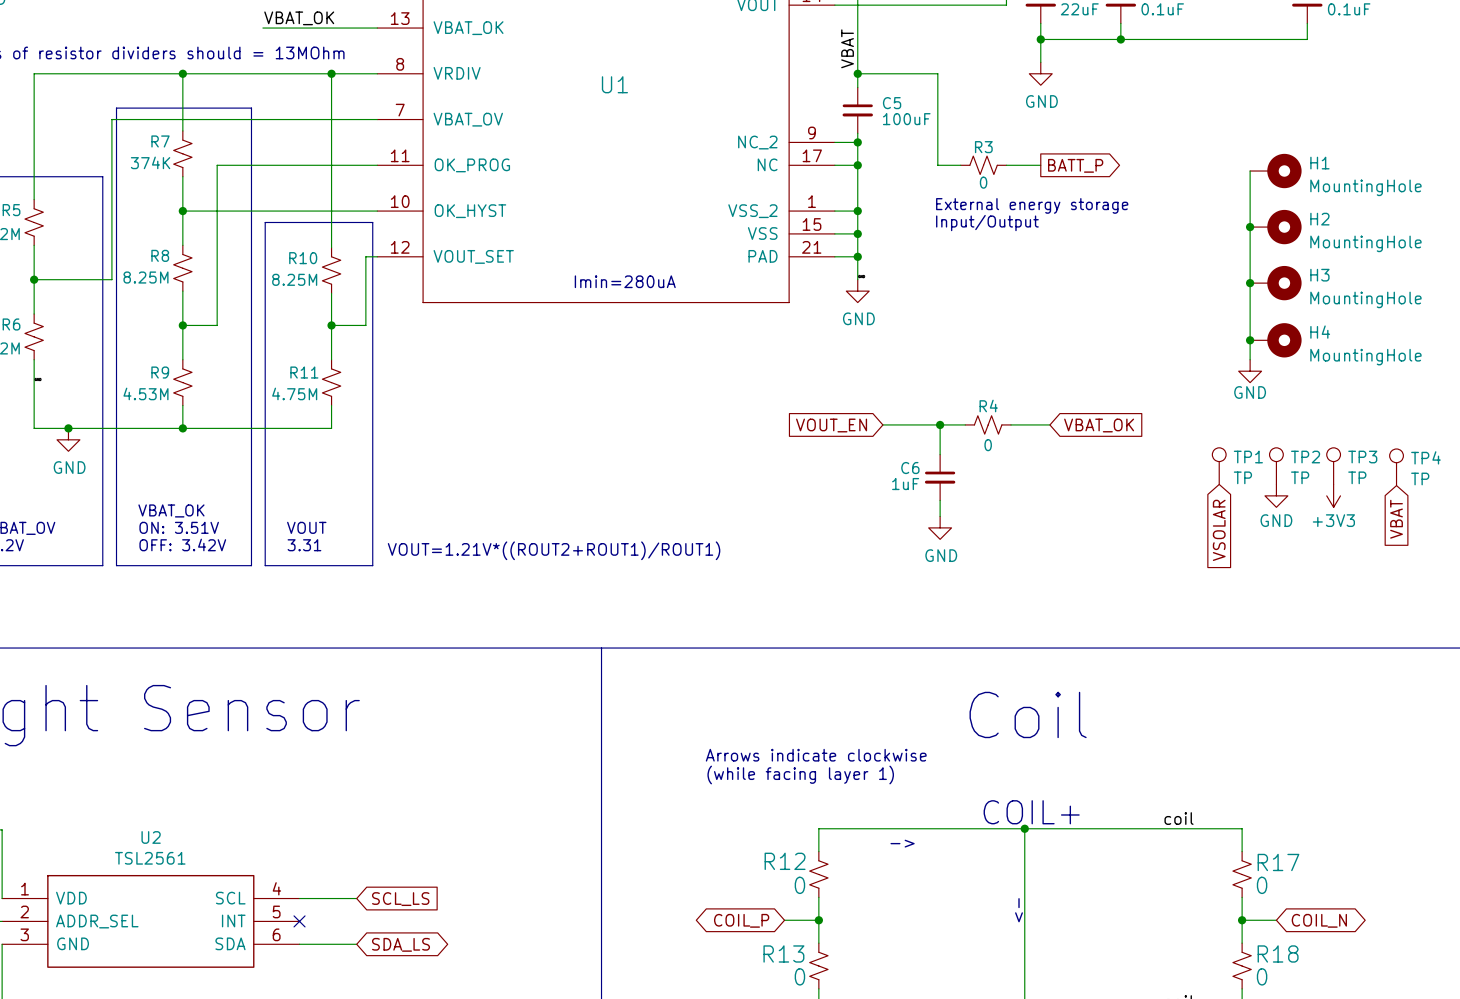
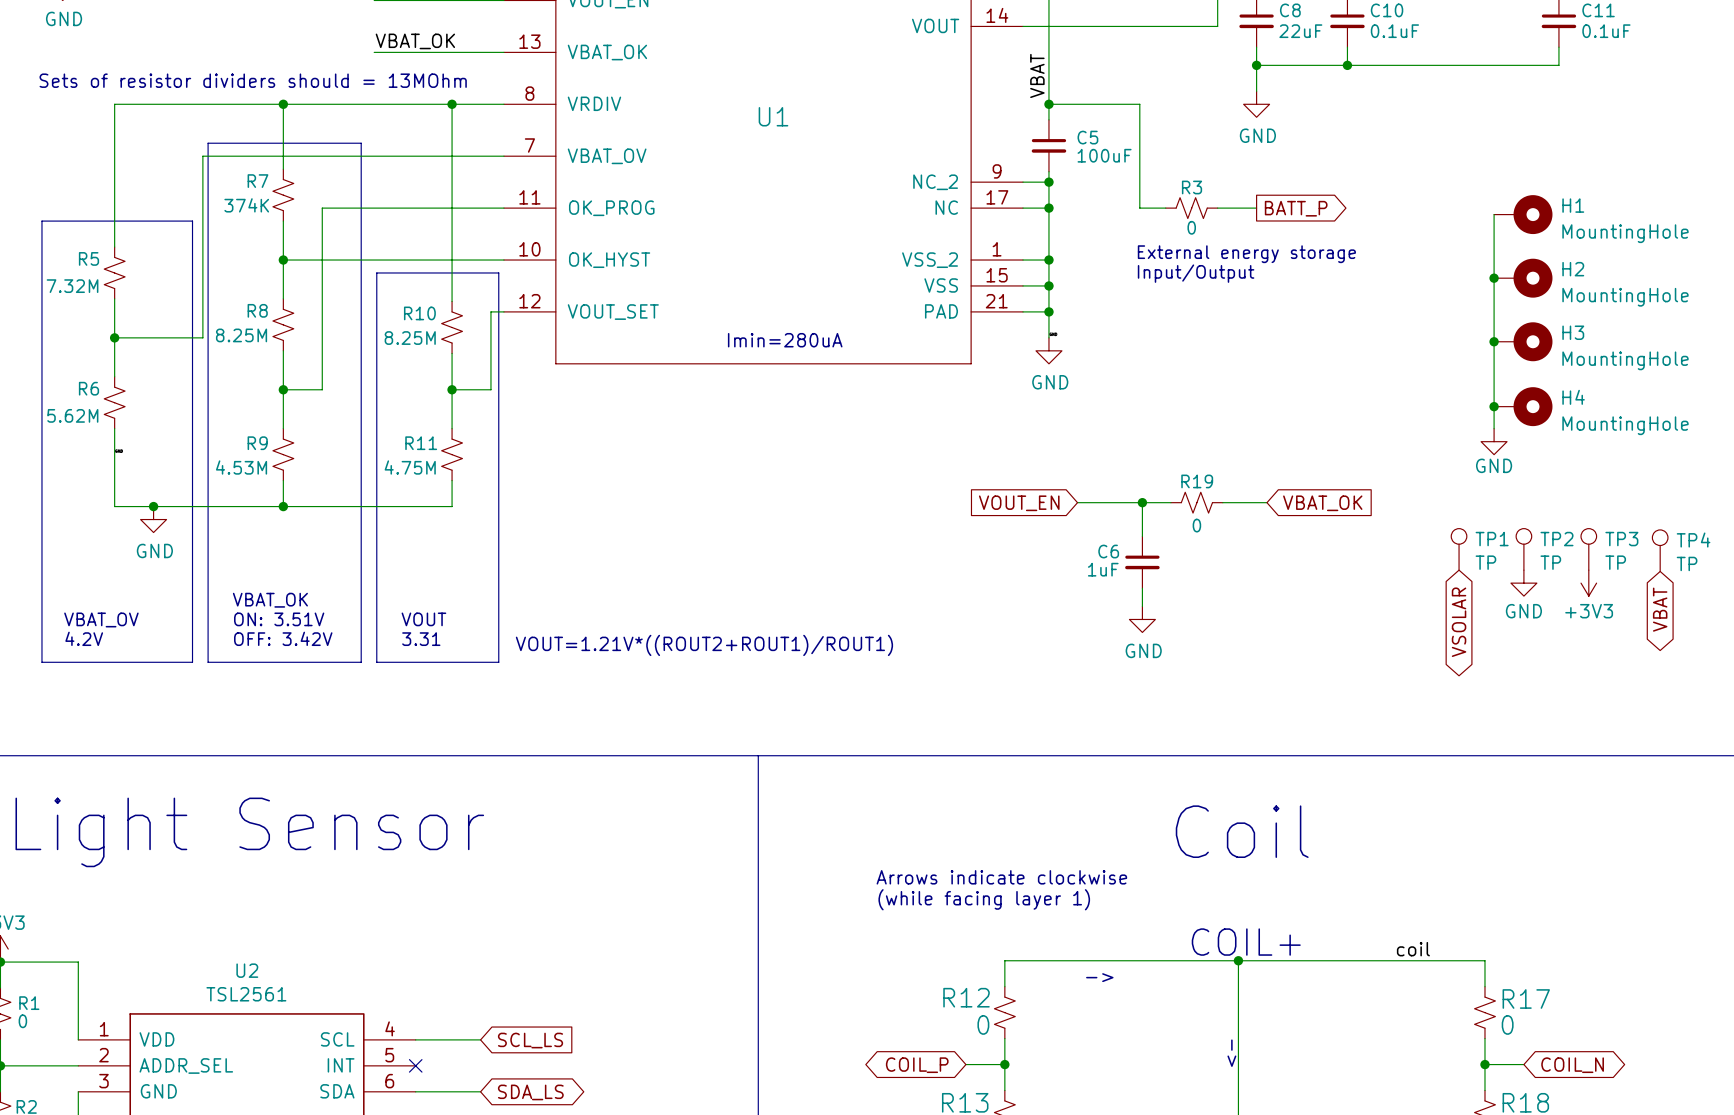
R4 name: R4 (988, 405) -> R19 (1197, 481)
global label shape: input (1396, 519) -> bidirectional (1660, 609)
global label shape: input (1219, 530) -> bidirectional (1459, 622)

